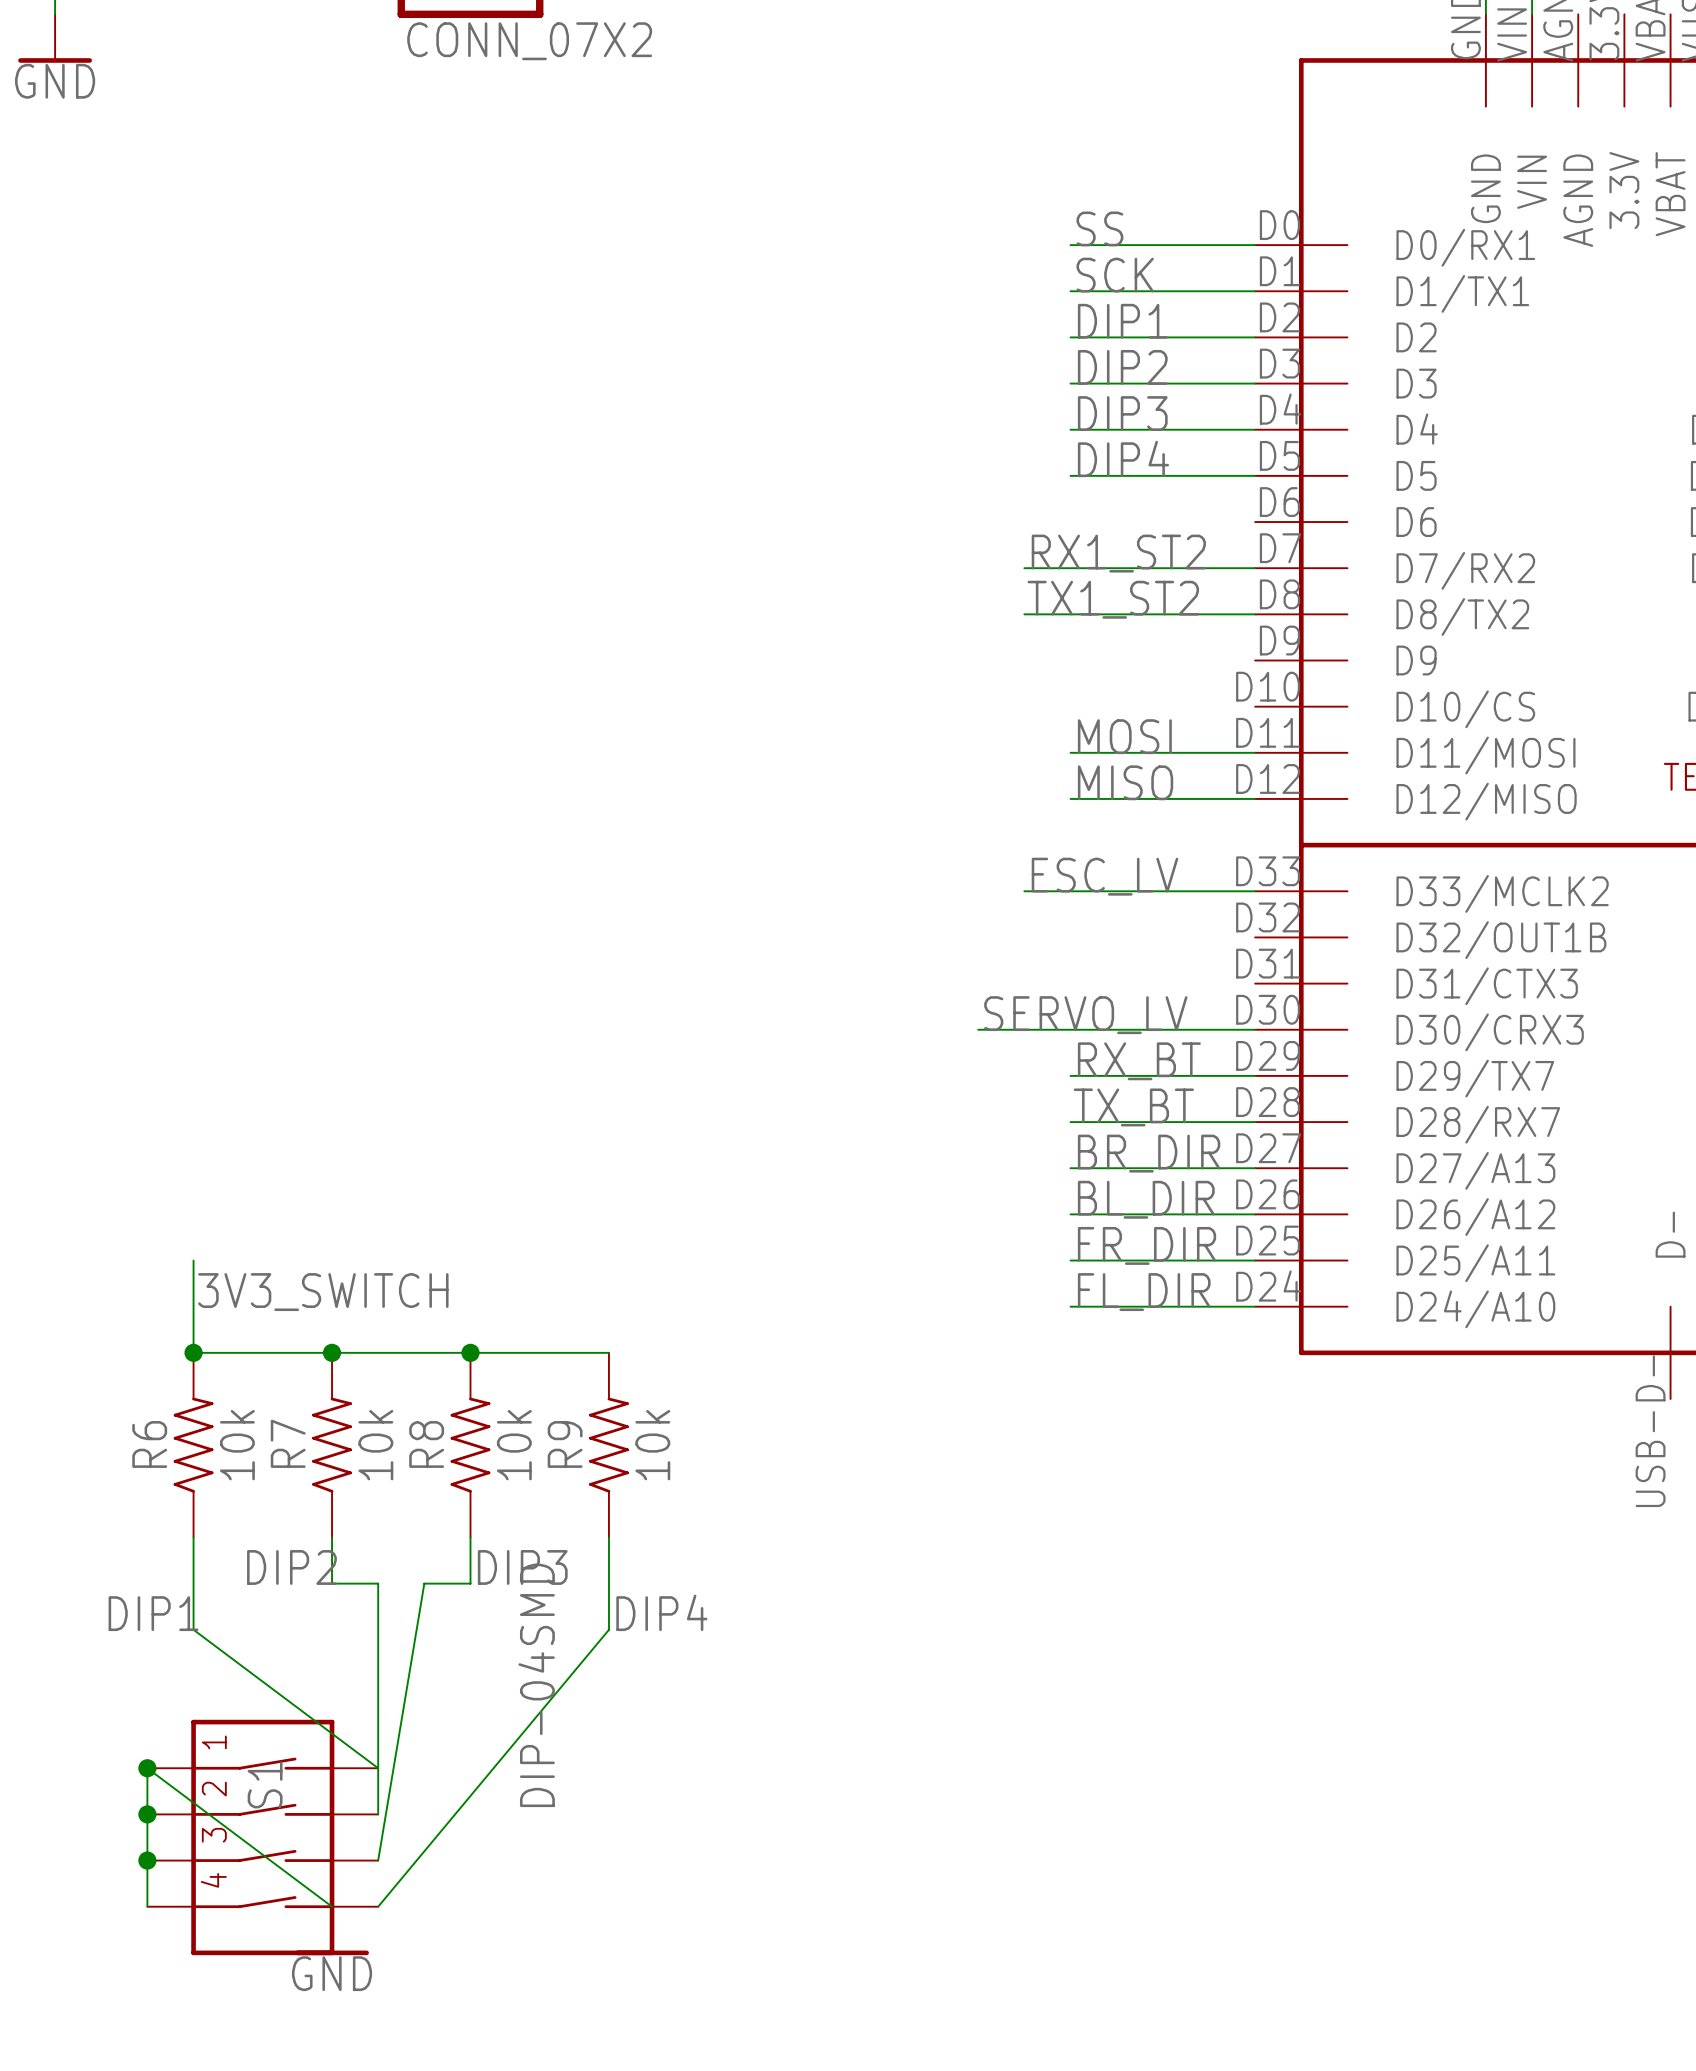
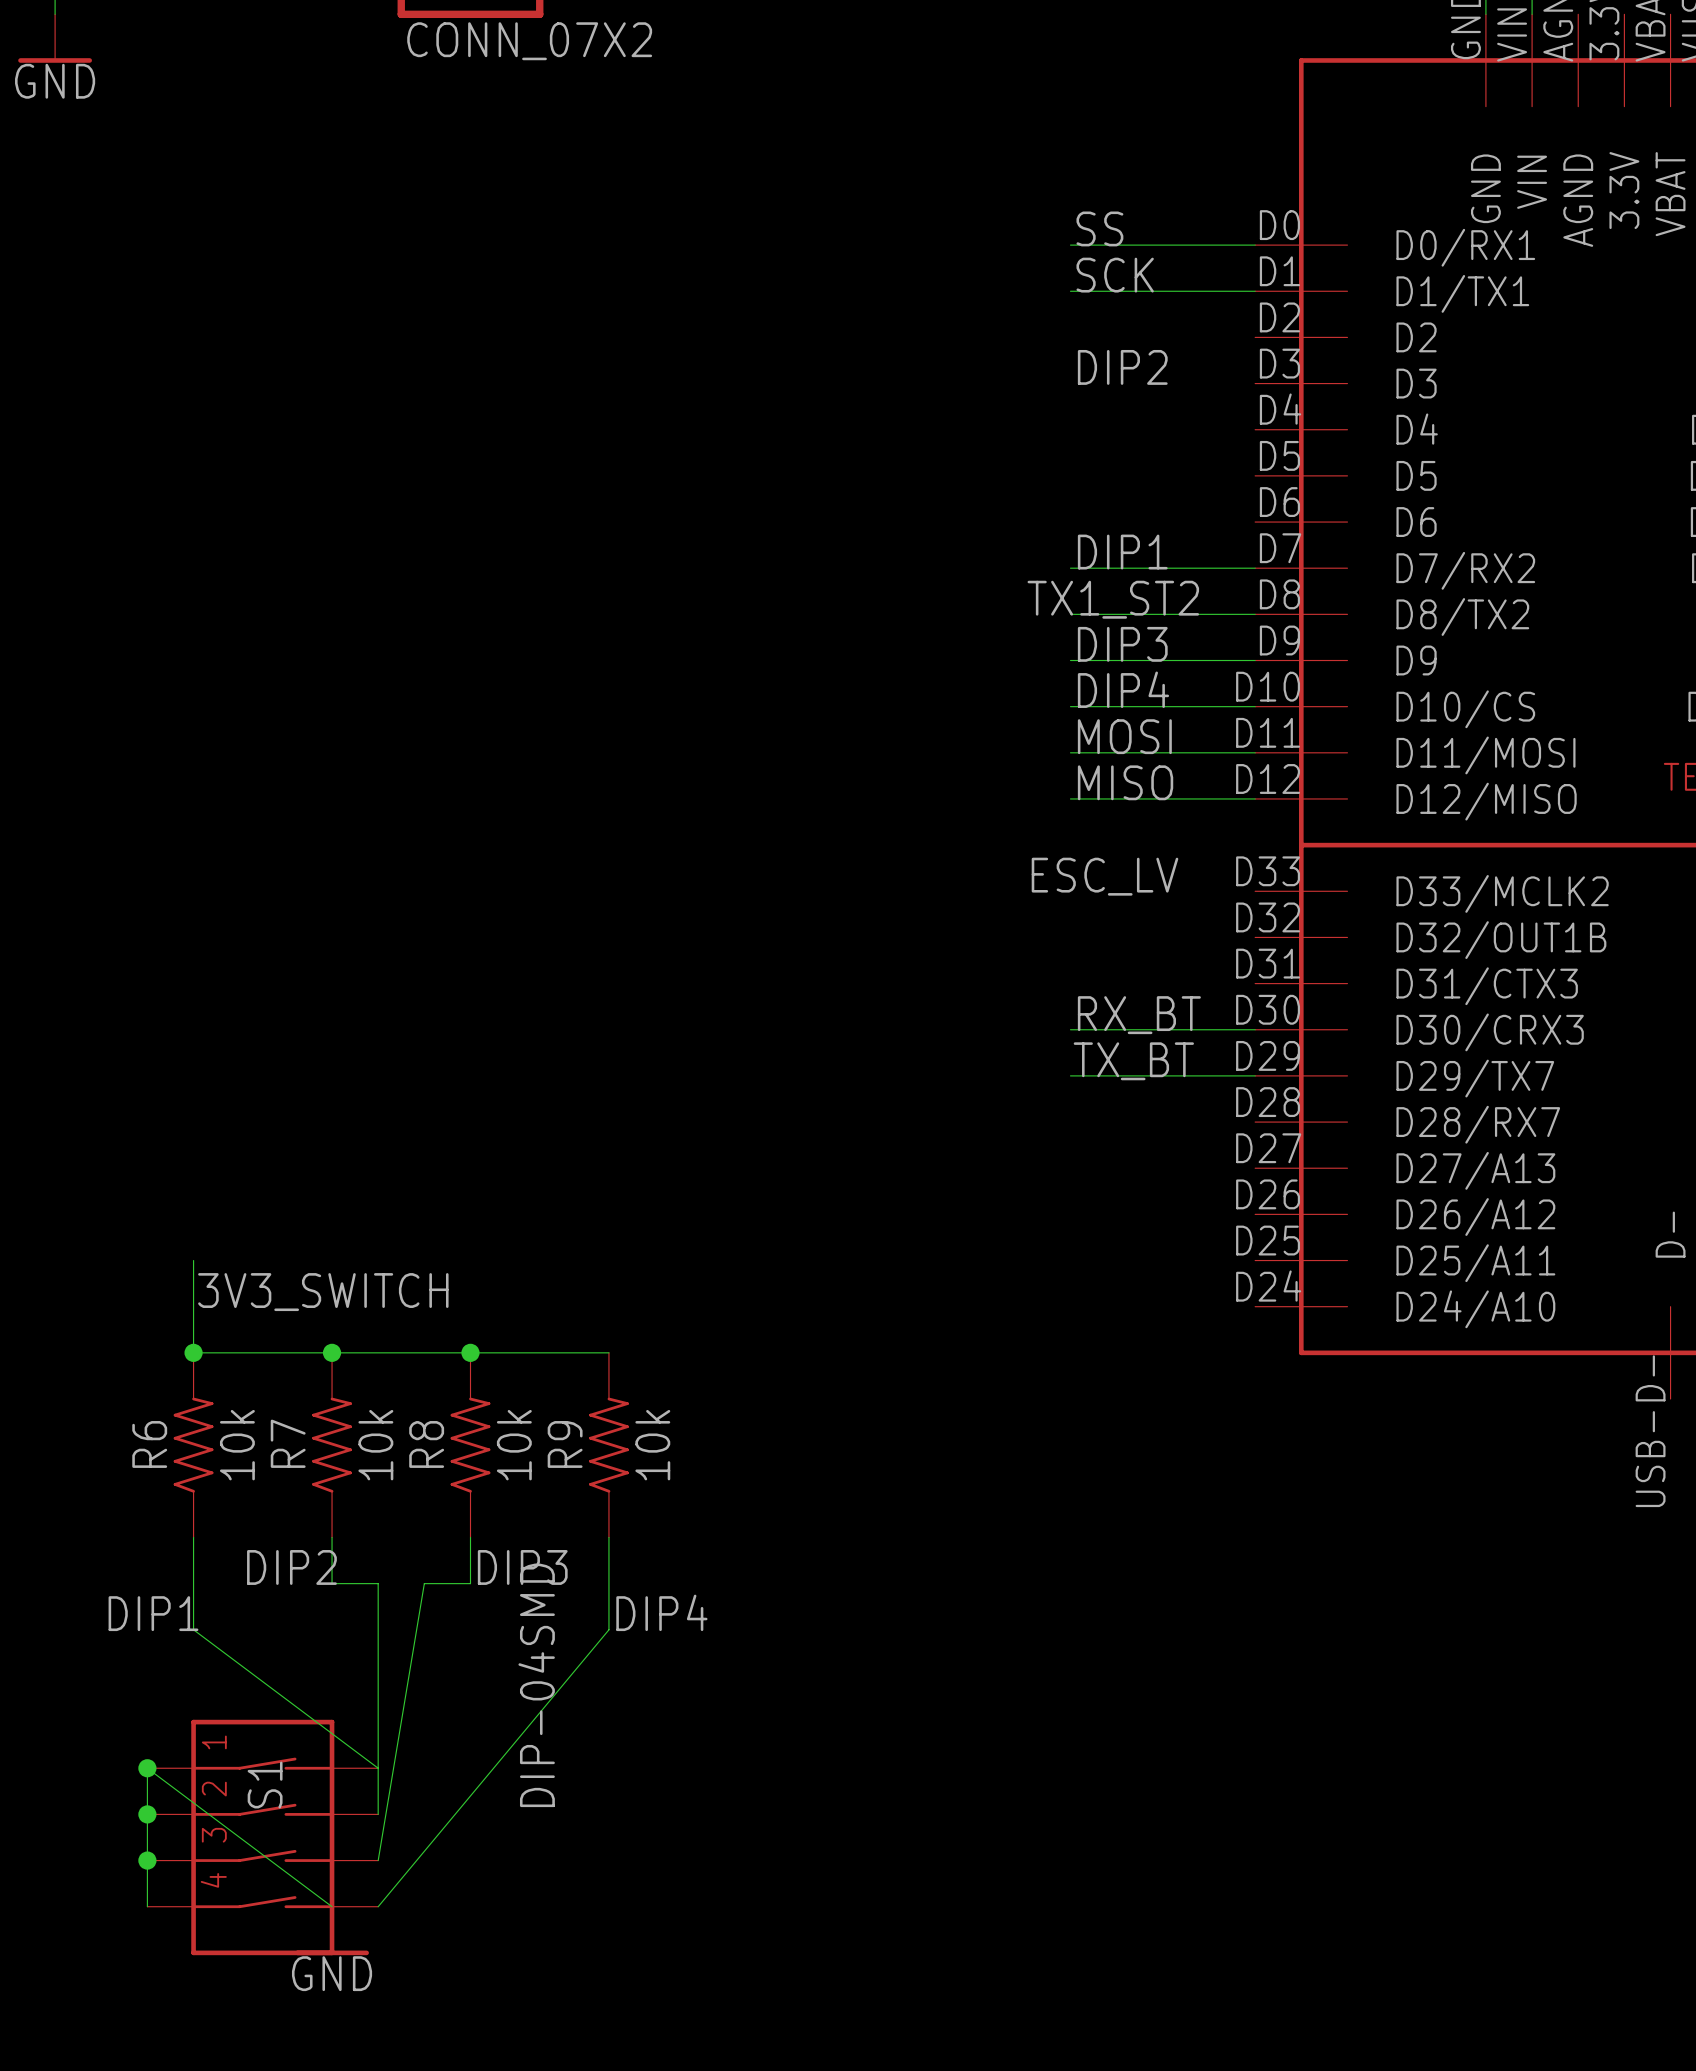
label position: DIP1 (1122, 321) -> DIP1 (1122, 552)
wire: (1070, 337) (1255, 337) -> none
wire: (1070, 383) (1255, 383) -> none
label position: DIP3 (1122, 413) -> DIP3 (1122, 644)
wire: (1070, 429) (1255, 429) -> (1070, 660) (1255, 660)
label position: DIP4 (1123, 458) -> DIP4 (1123, 689)
wire: (1070, 475) (1255, 475) -> (1070, 706) (1255, 706)
label: RX1_ST2 (1118, 553) -> none
wire: (1024, 568) (1070, 568) -> none
wire: (1024, 614) (1070, 614) -> none
wire: (1024, 891) (1255, 891) -> none
label: SERVO_LV (1085, 1015) -> none
label: none -> RX_BT (1139, 1015)
wire: (978, 1029) (1070, 1029) -> none
label: RX_BT (1139, 1061) -> TX_BT (1133, 1061)
label: TX_BT (1133, 1107) -> none
wire: (1070, 1122) (1255, 1122) -> none
label: BR_DIR (1149, 1153) -> none
wire: (1070, 1168) (1255, 1168) -> none
label: BL_DIR (1146, 1199) -> none
wire: (1070, 1214) (1255, 1214) -> none
label: FR_DIR (1147, 1245) -> none
wire: (1070, 1260) (1255, 1260) -> none
label: FL_DIR (1144, 1292) -> none
wire: (1070, 1306) (1255, 1306) -> none

